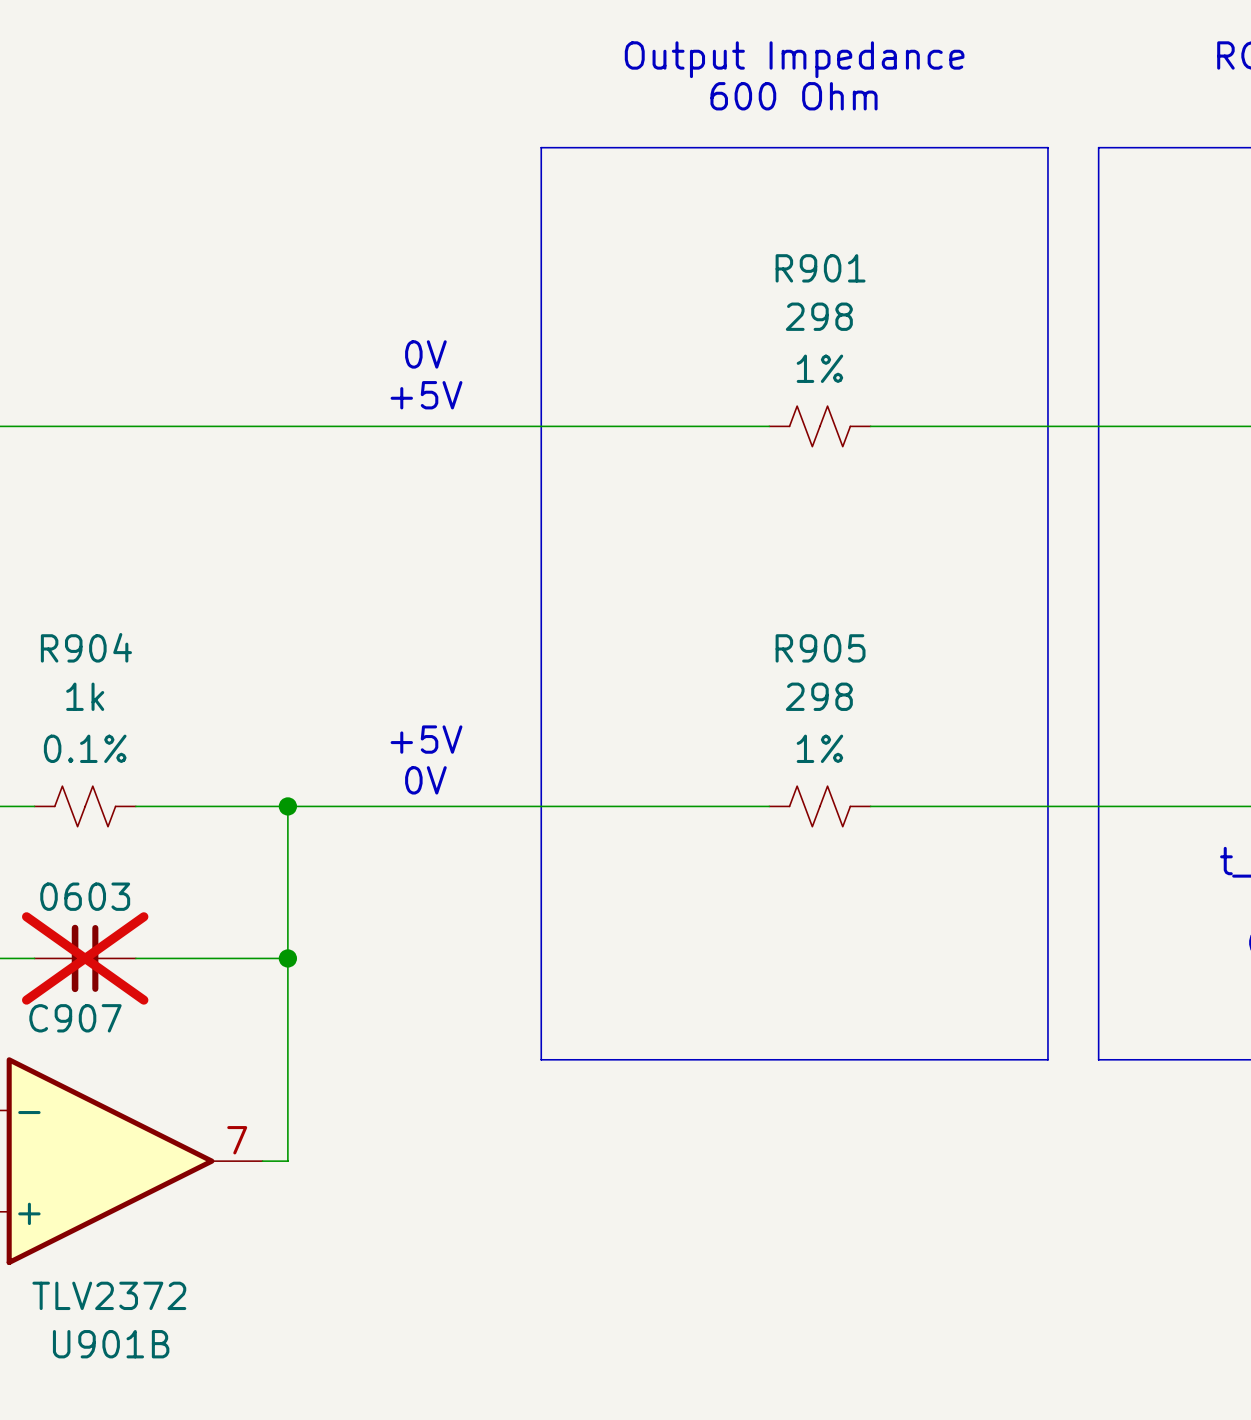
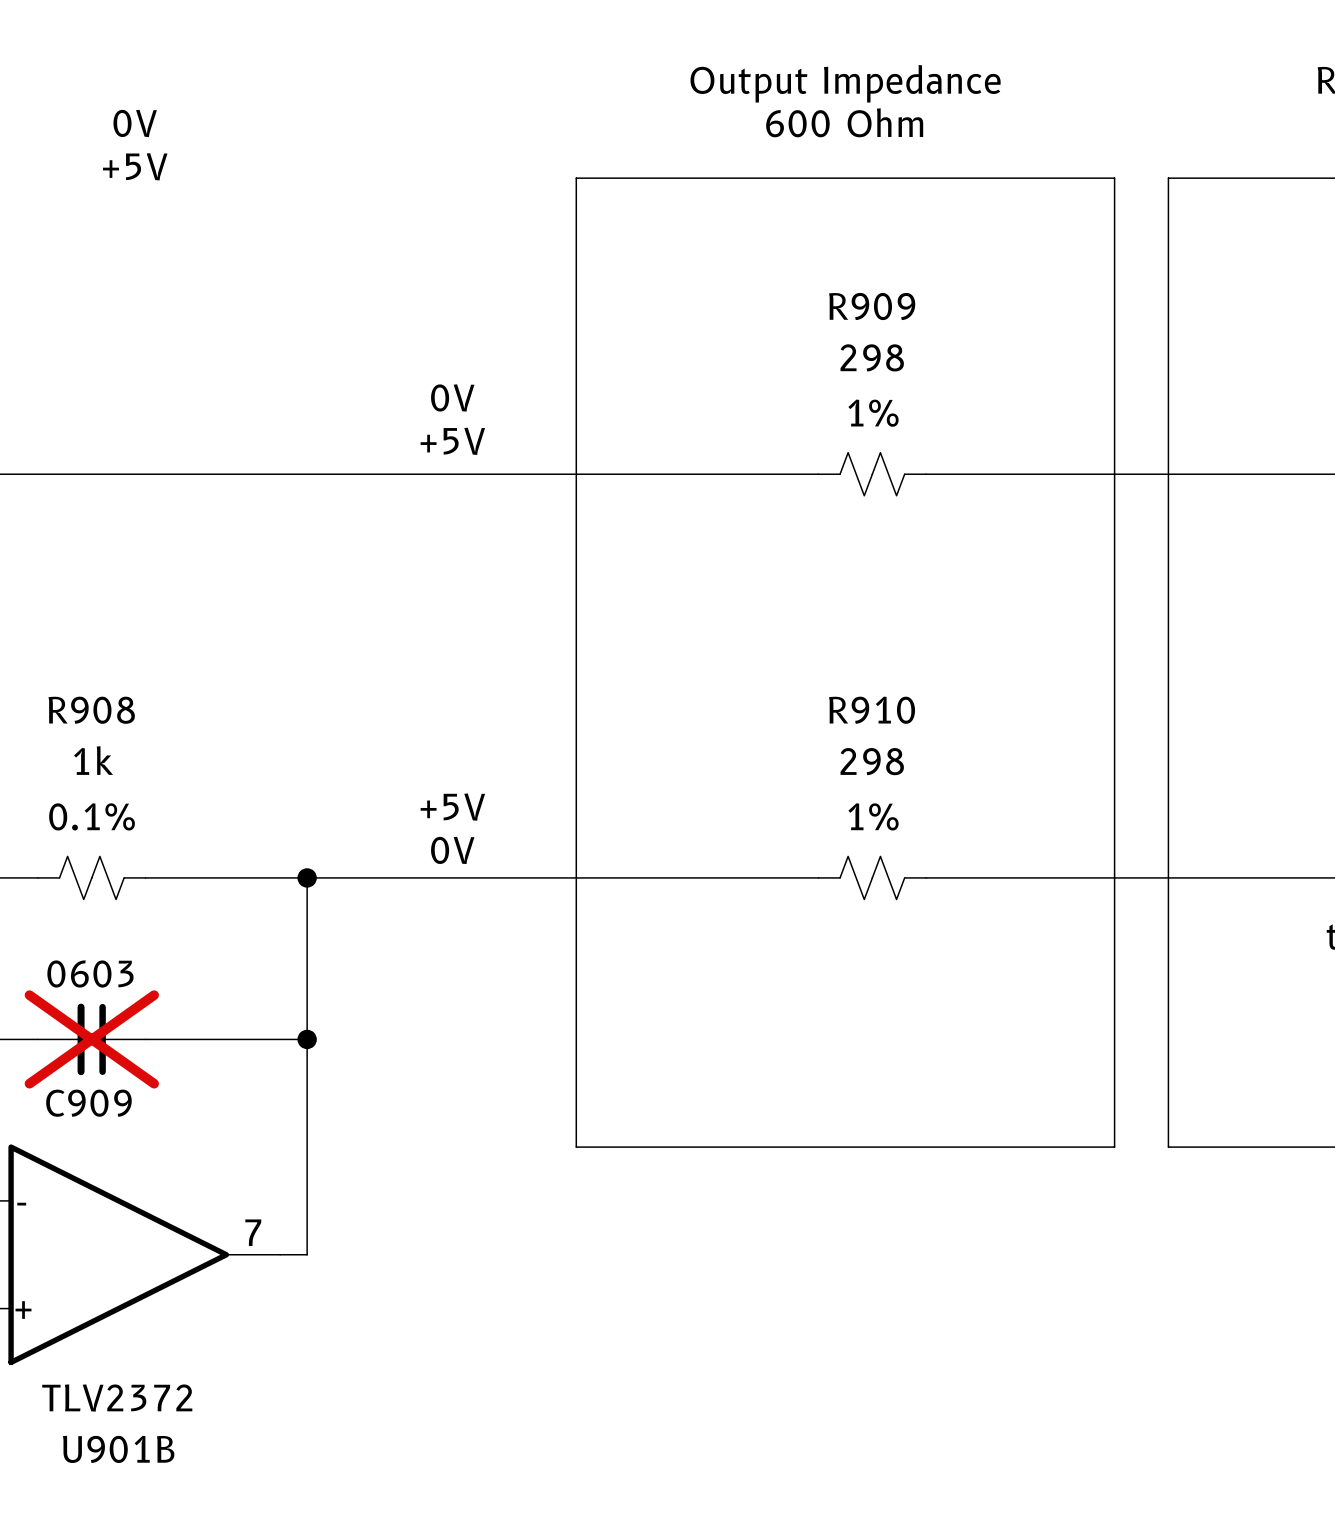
text: none -> 0V (135, 123)
text: none -> +5V (135, 166)
R901 name: R901 (820, 268) -> R909 (872, 306)
R904 name: R904 (86, 647) -> R908 (91, 710)
R905 name: R905 (820, 648) -> R910 (872, 710)
C907 name: C907 (75, 1018) -> C909 (88, 1103)

